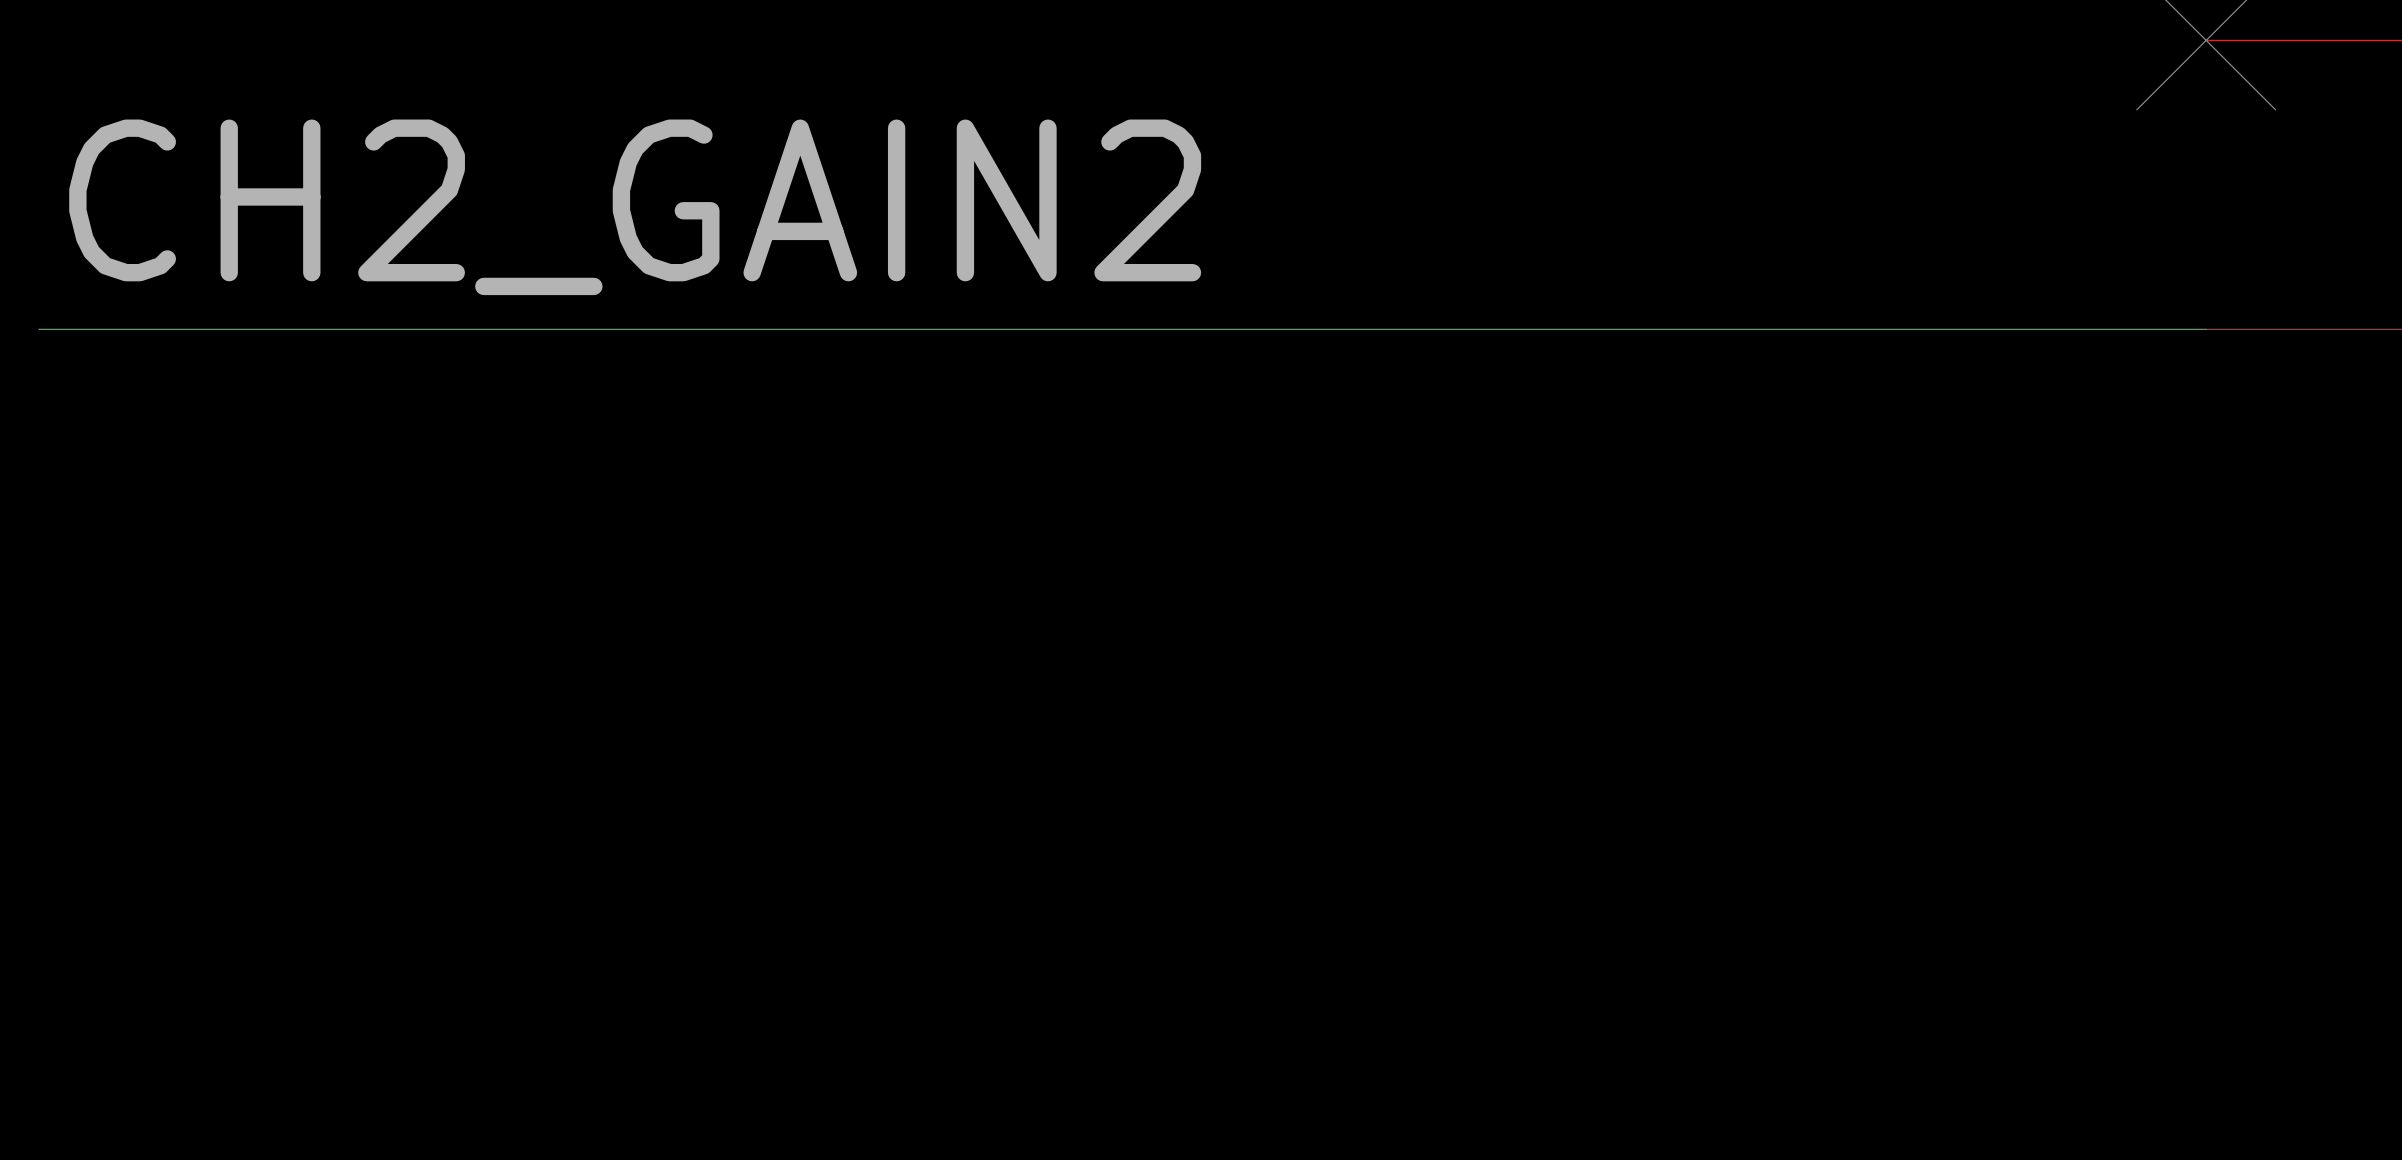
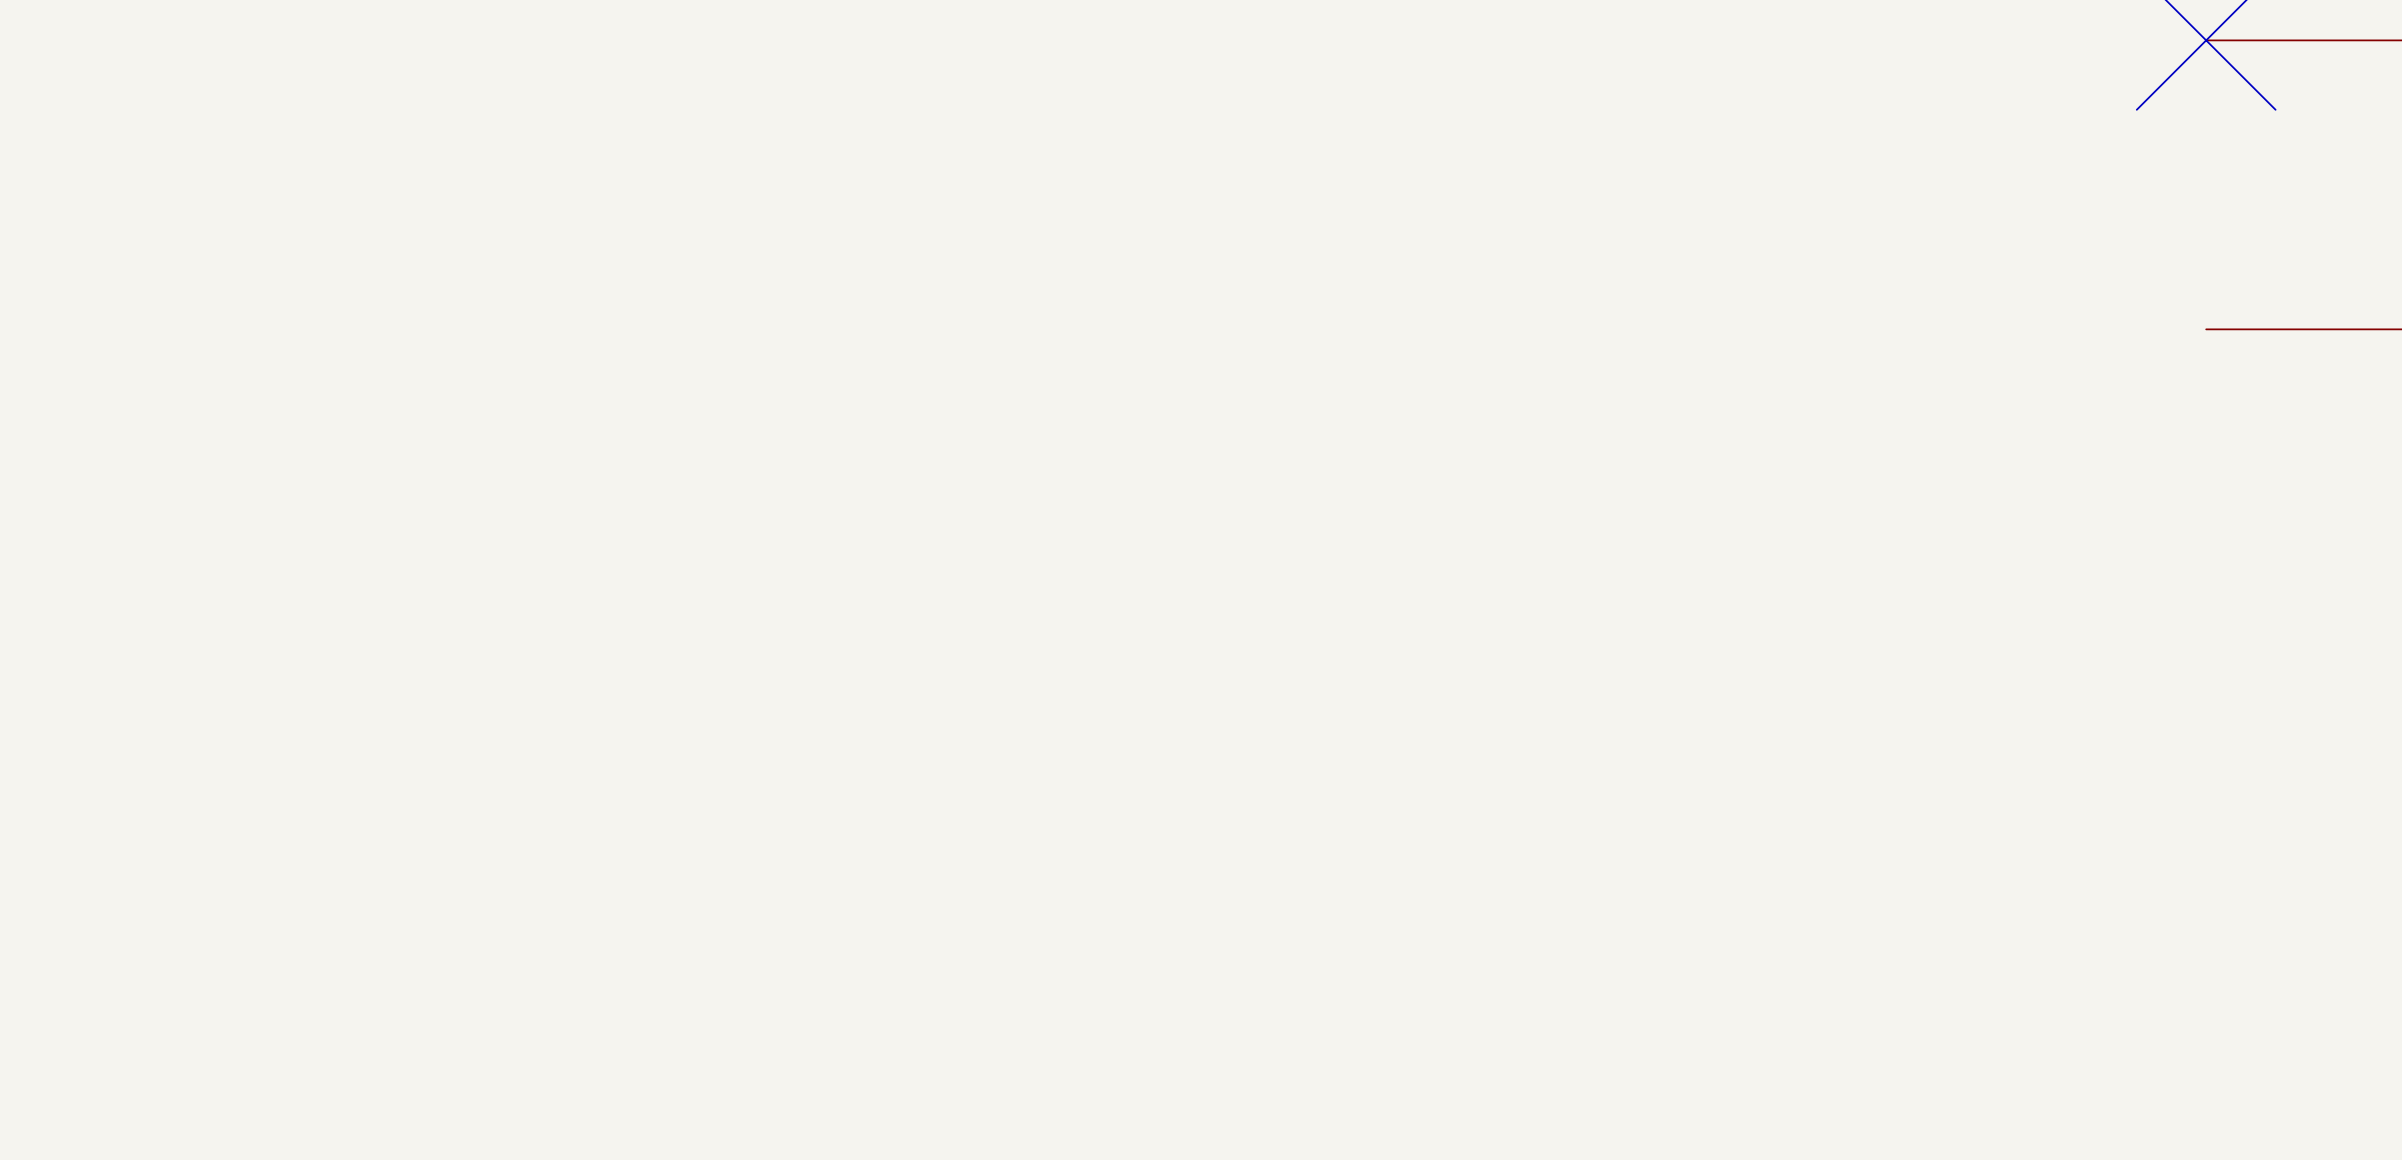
label: CH2_GAIN2 (635, 207) -> none
wire: (38, 329) (2206, 329) -> none

